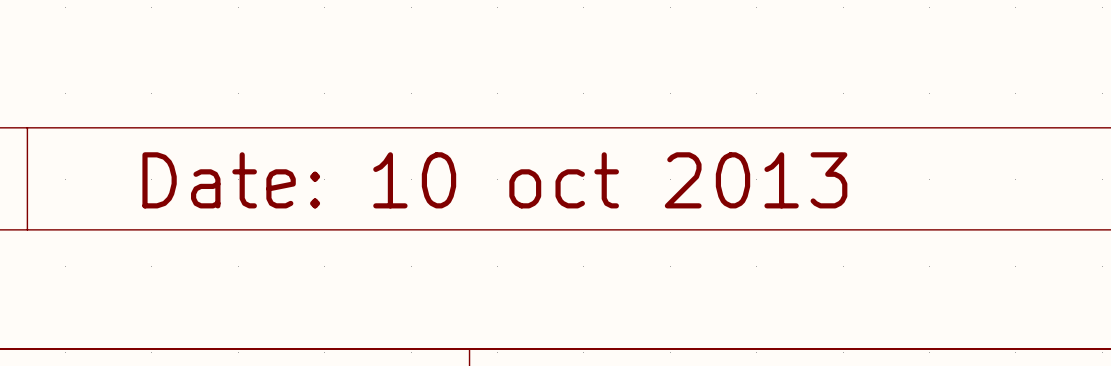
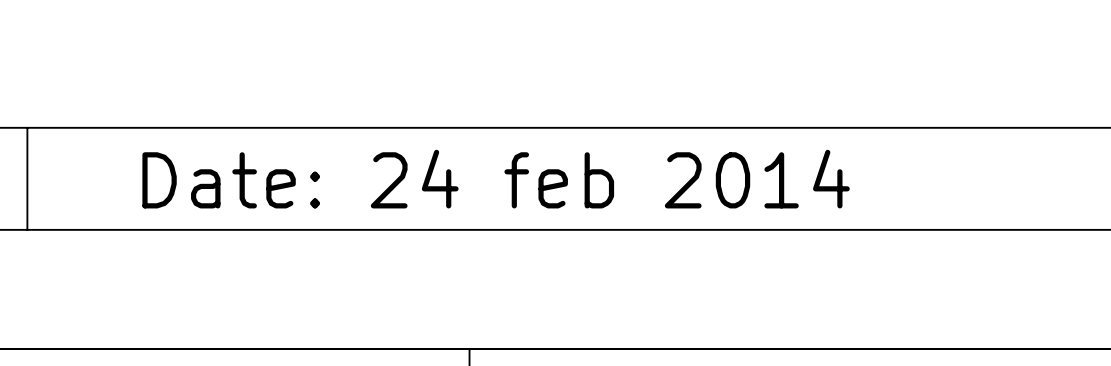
title block: Date: 10 oct 2013 (494, 180) -> Date: 24 feb 2014 (496, 179)

